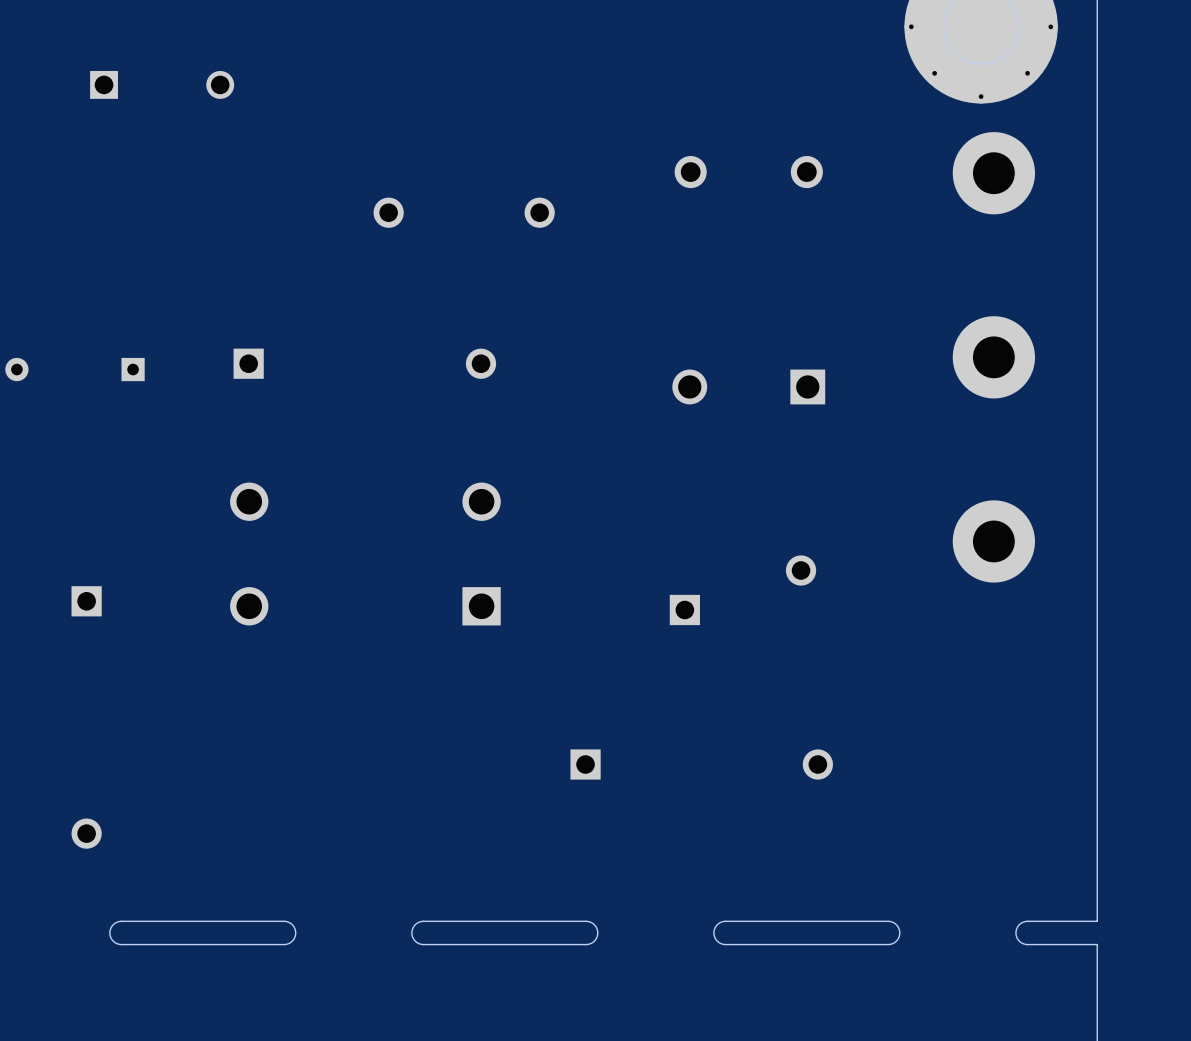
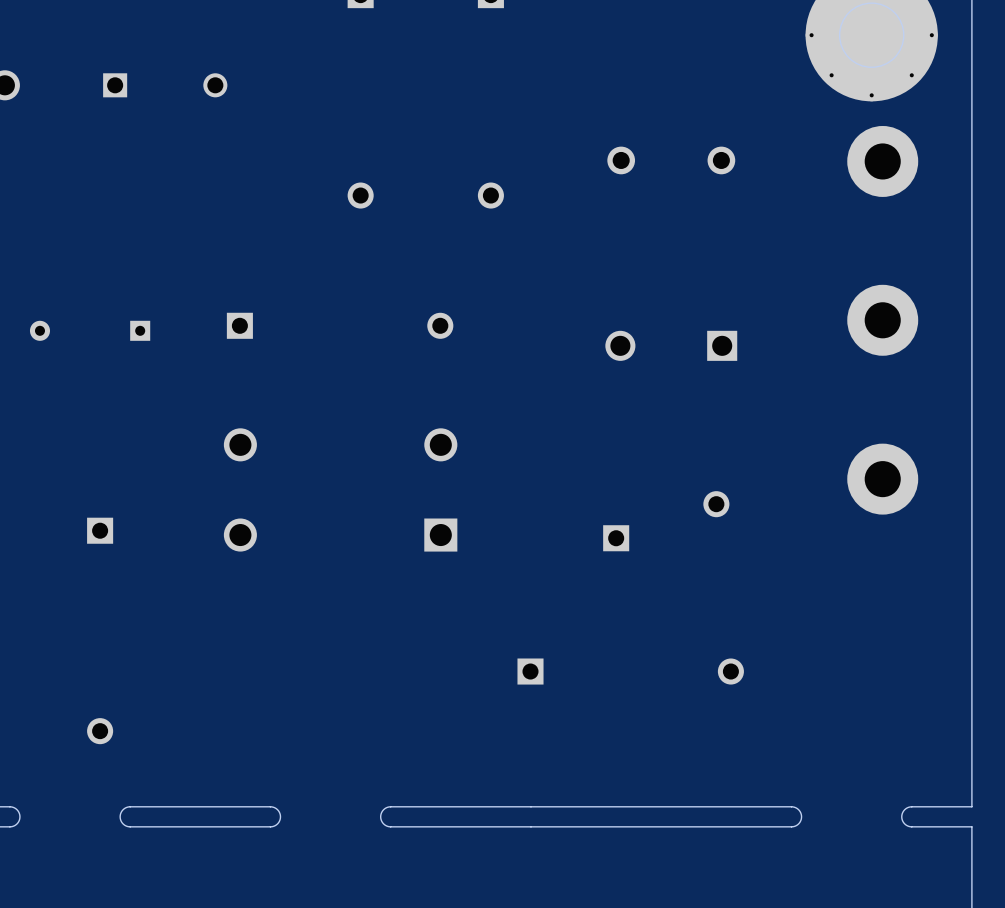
board edge: (586, 921) (594, 924) (597, 932) (594, 941) (586, 944) -> (651, 826) (531, 826)
board edge: (725, 921) (717, 924) (713, 932) (717, 941) (725, 944) -> (651, 806) (531, 806)

